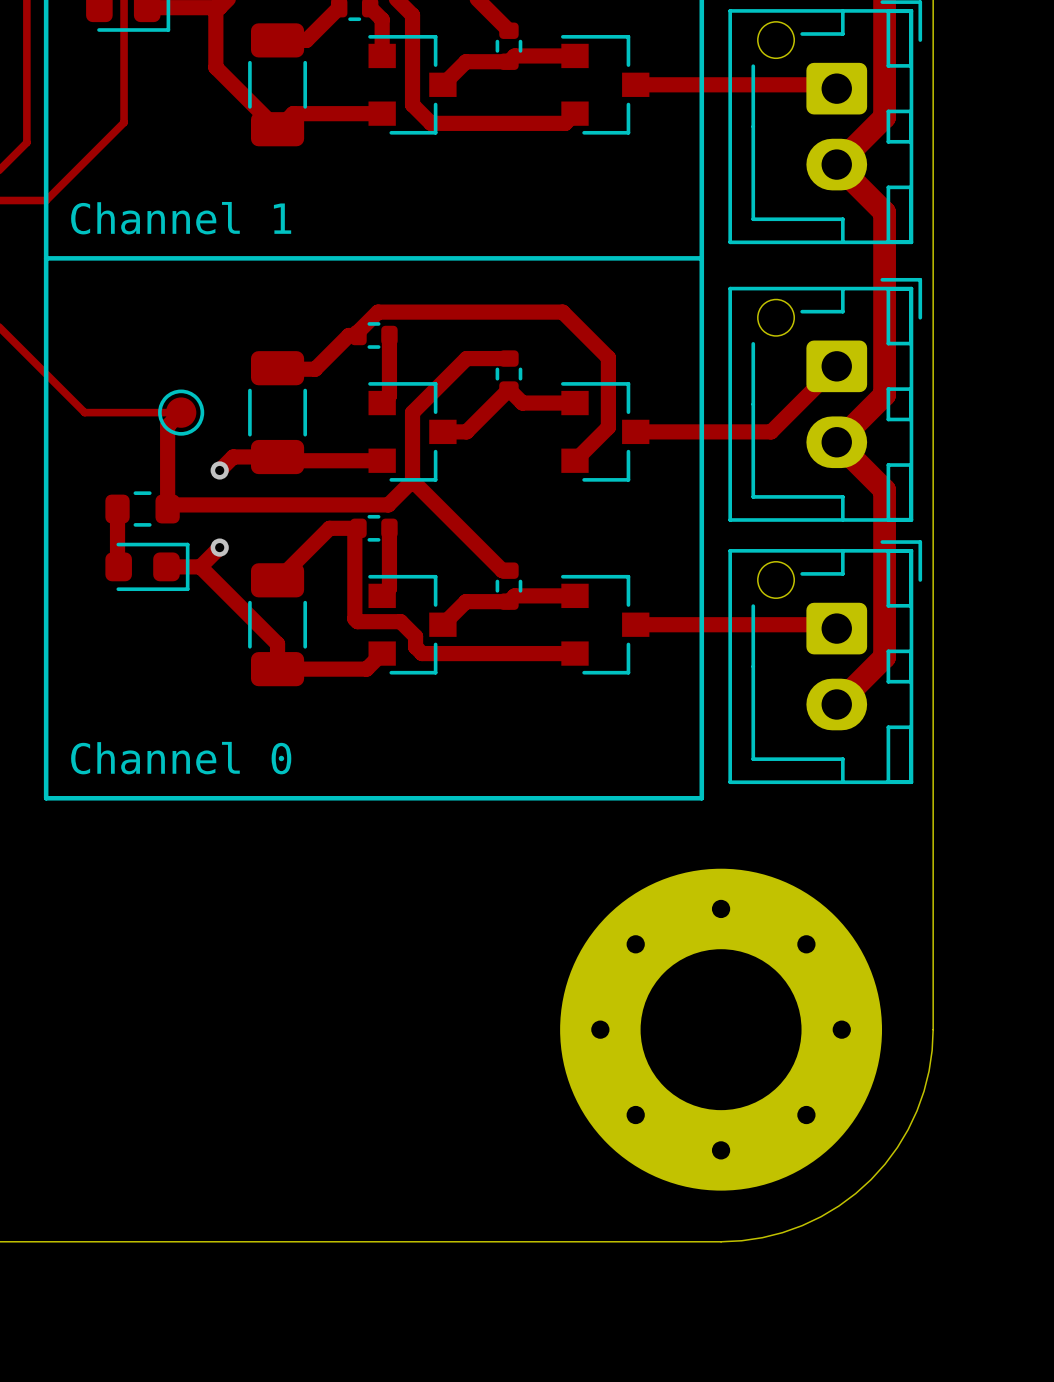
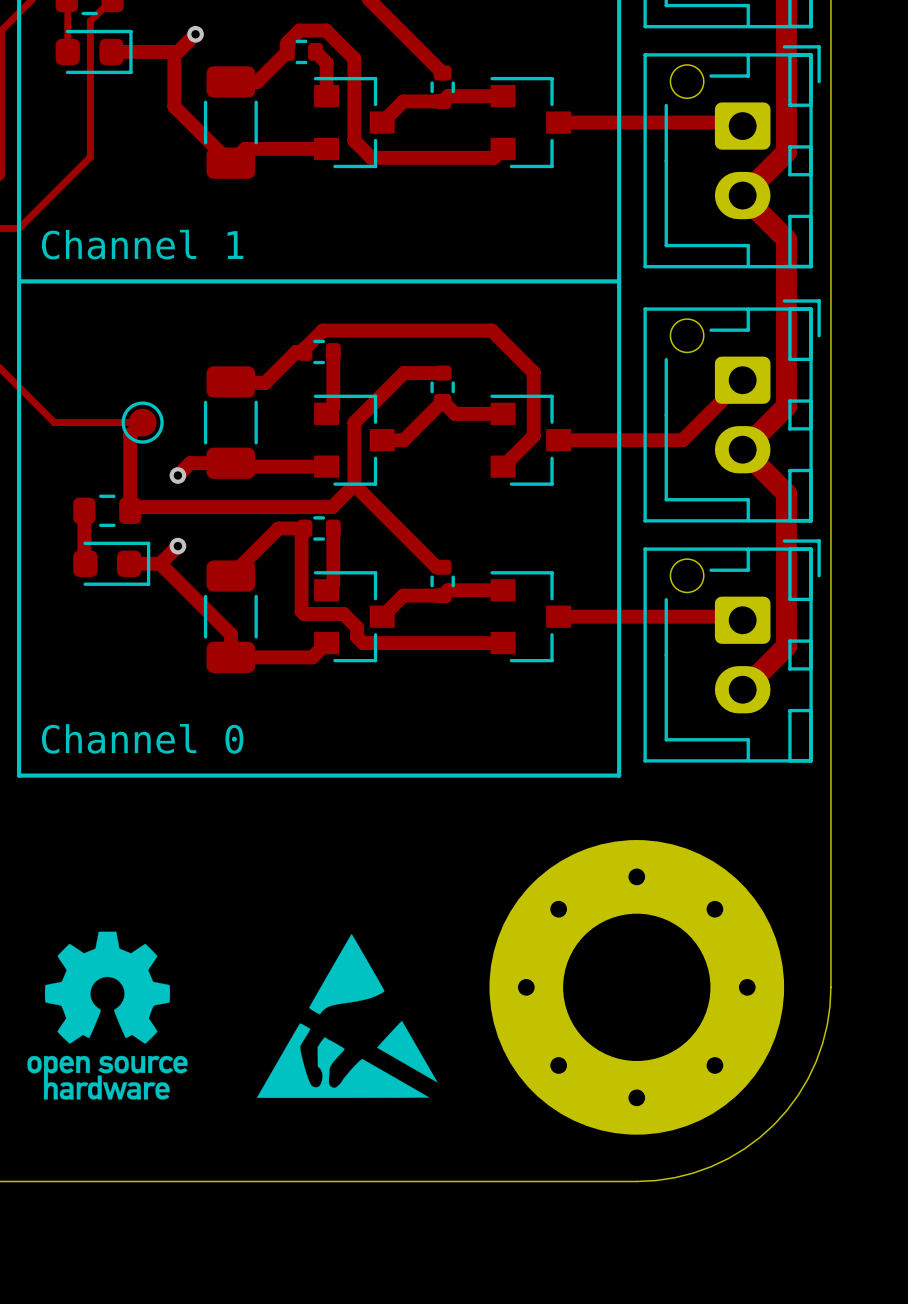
drawing: none -> [27, 931, 188, 1100]
drawing: none -> [256, 934, 438, 1098]

